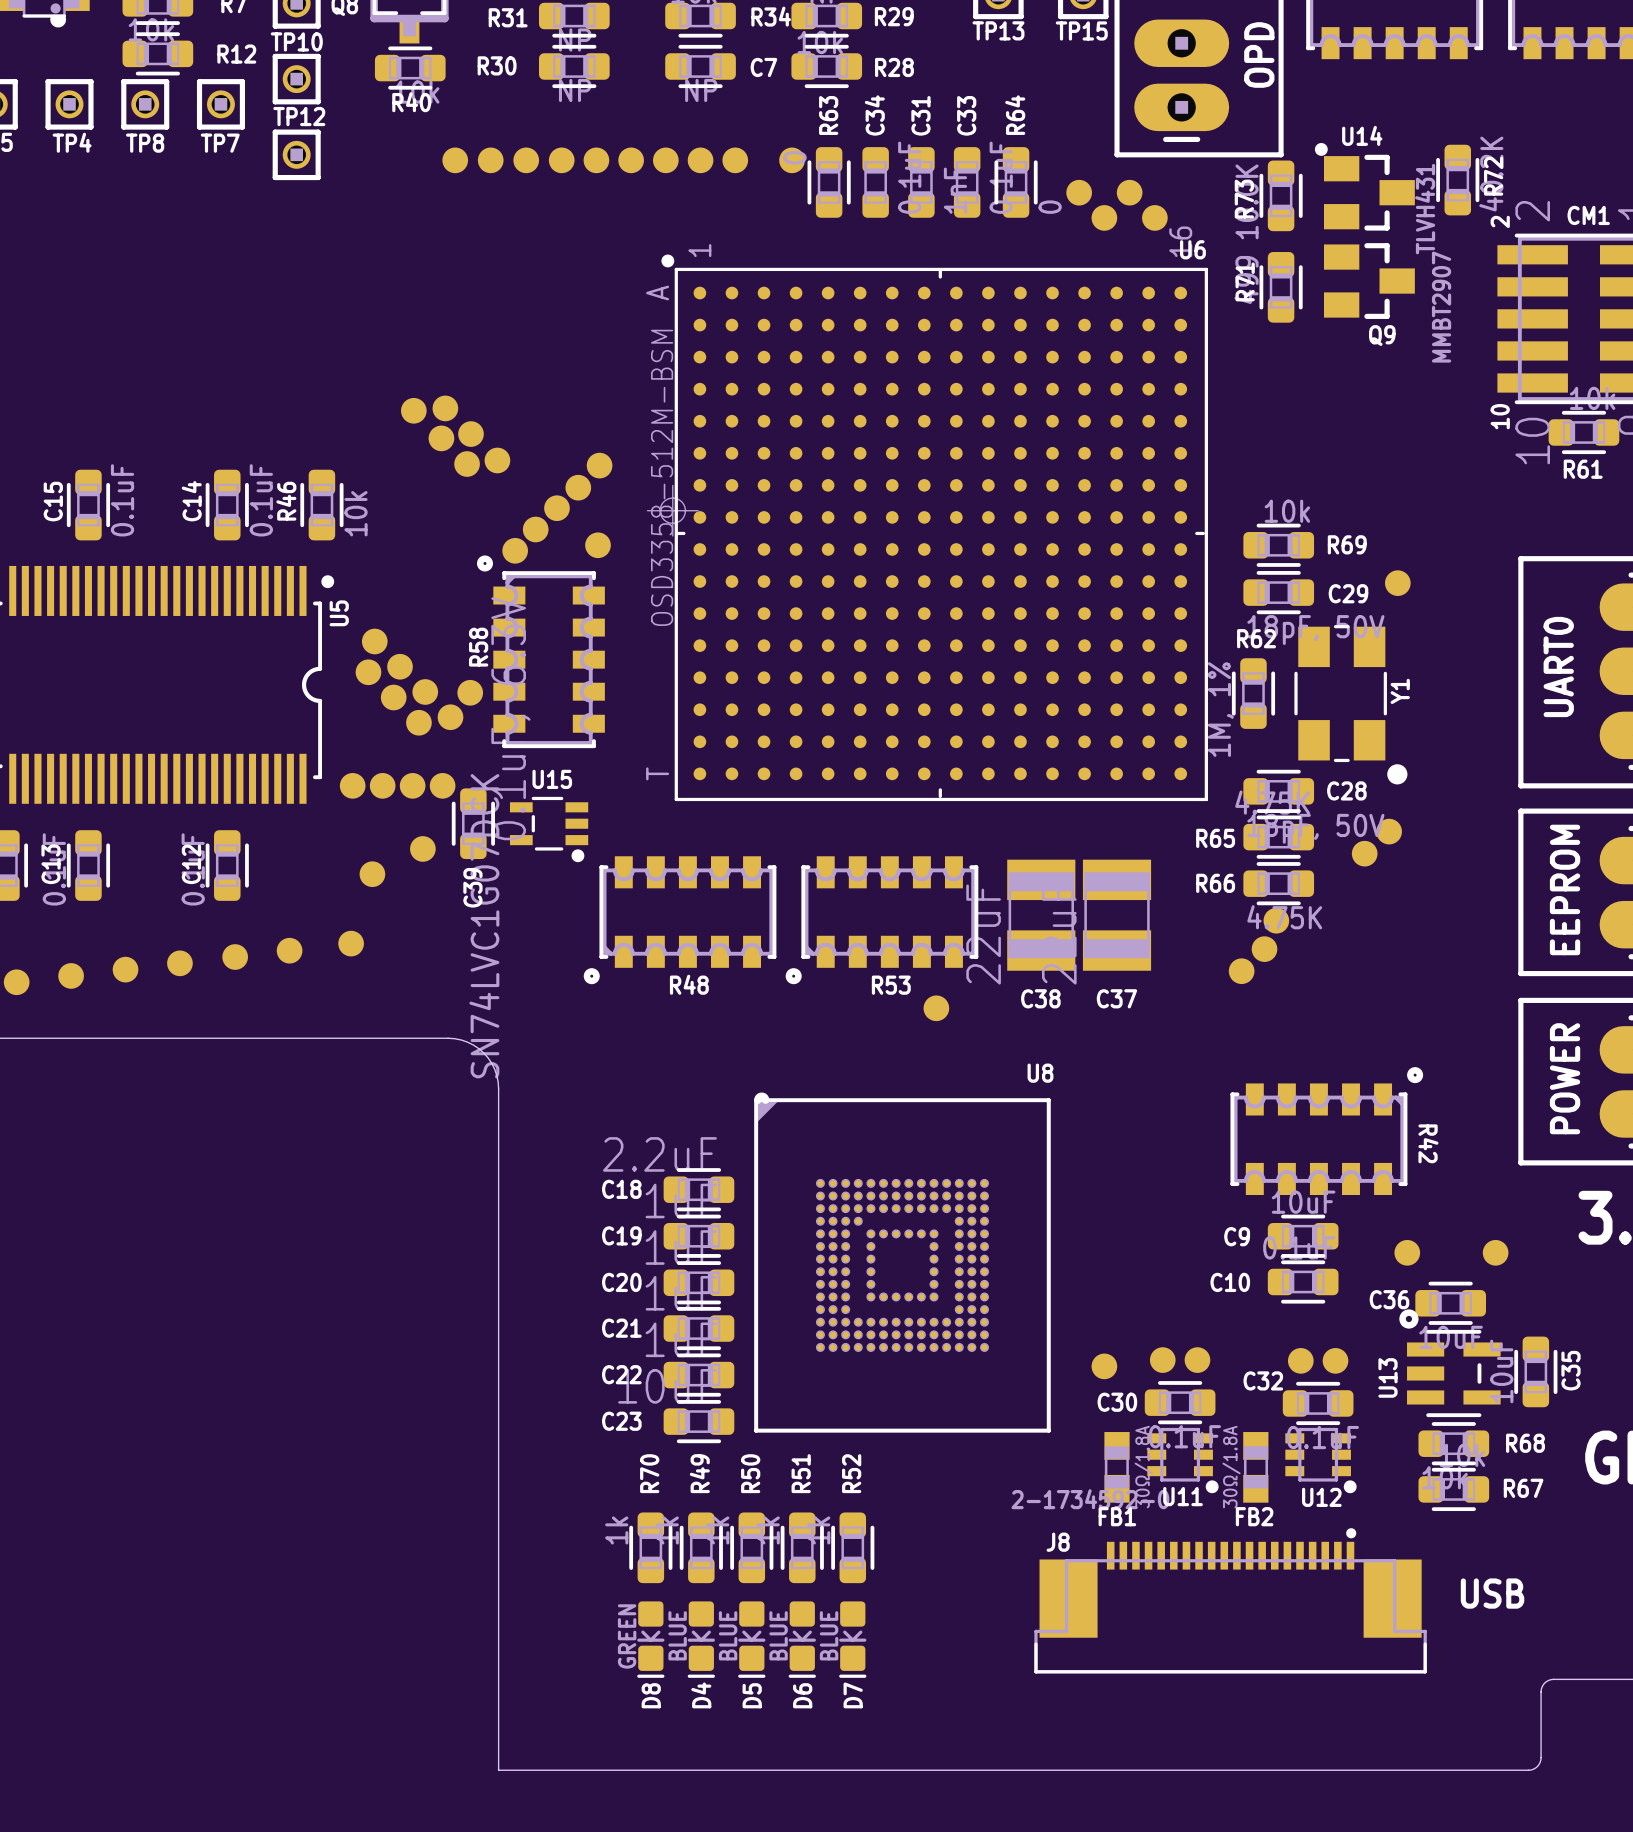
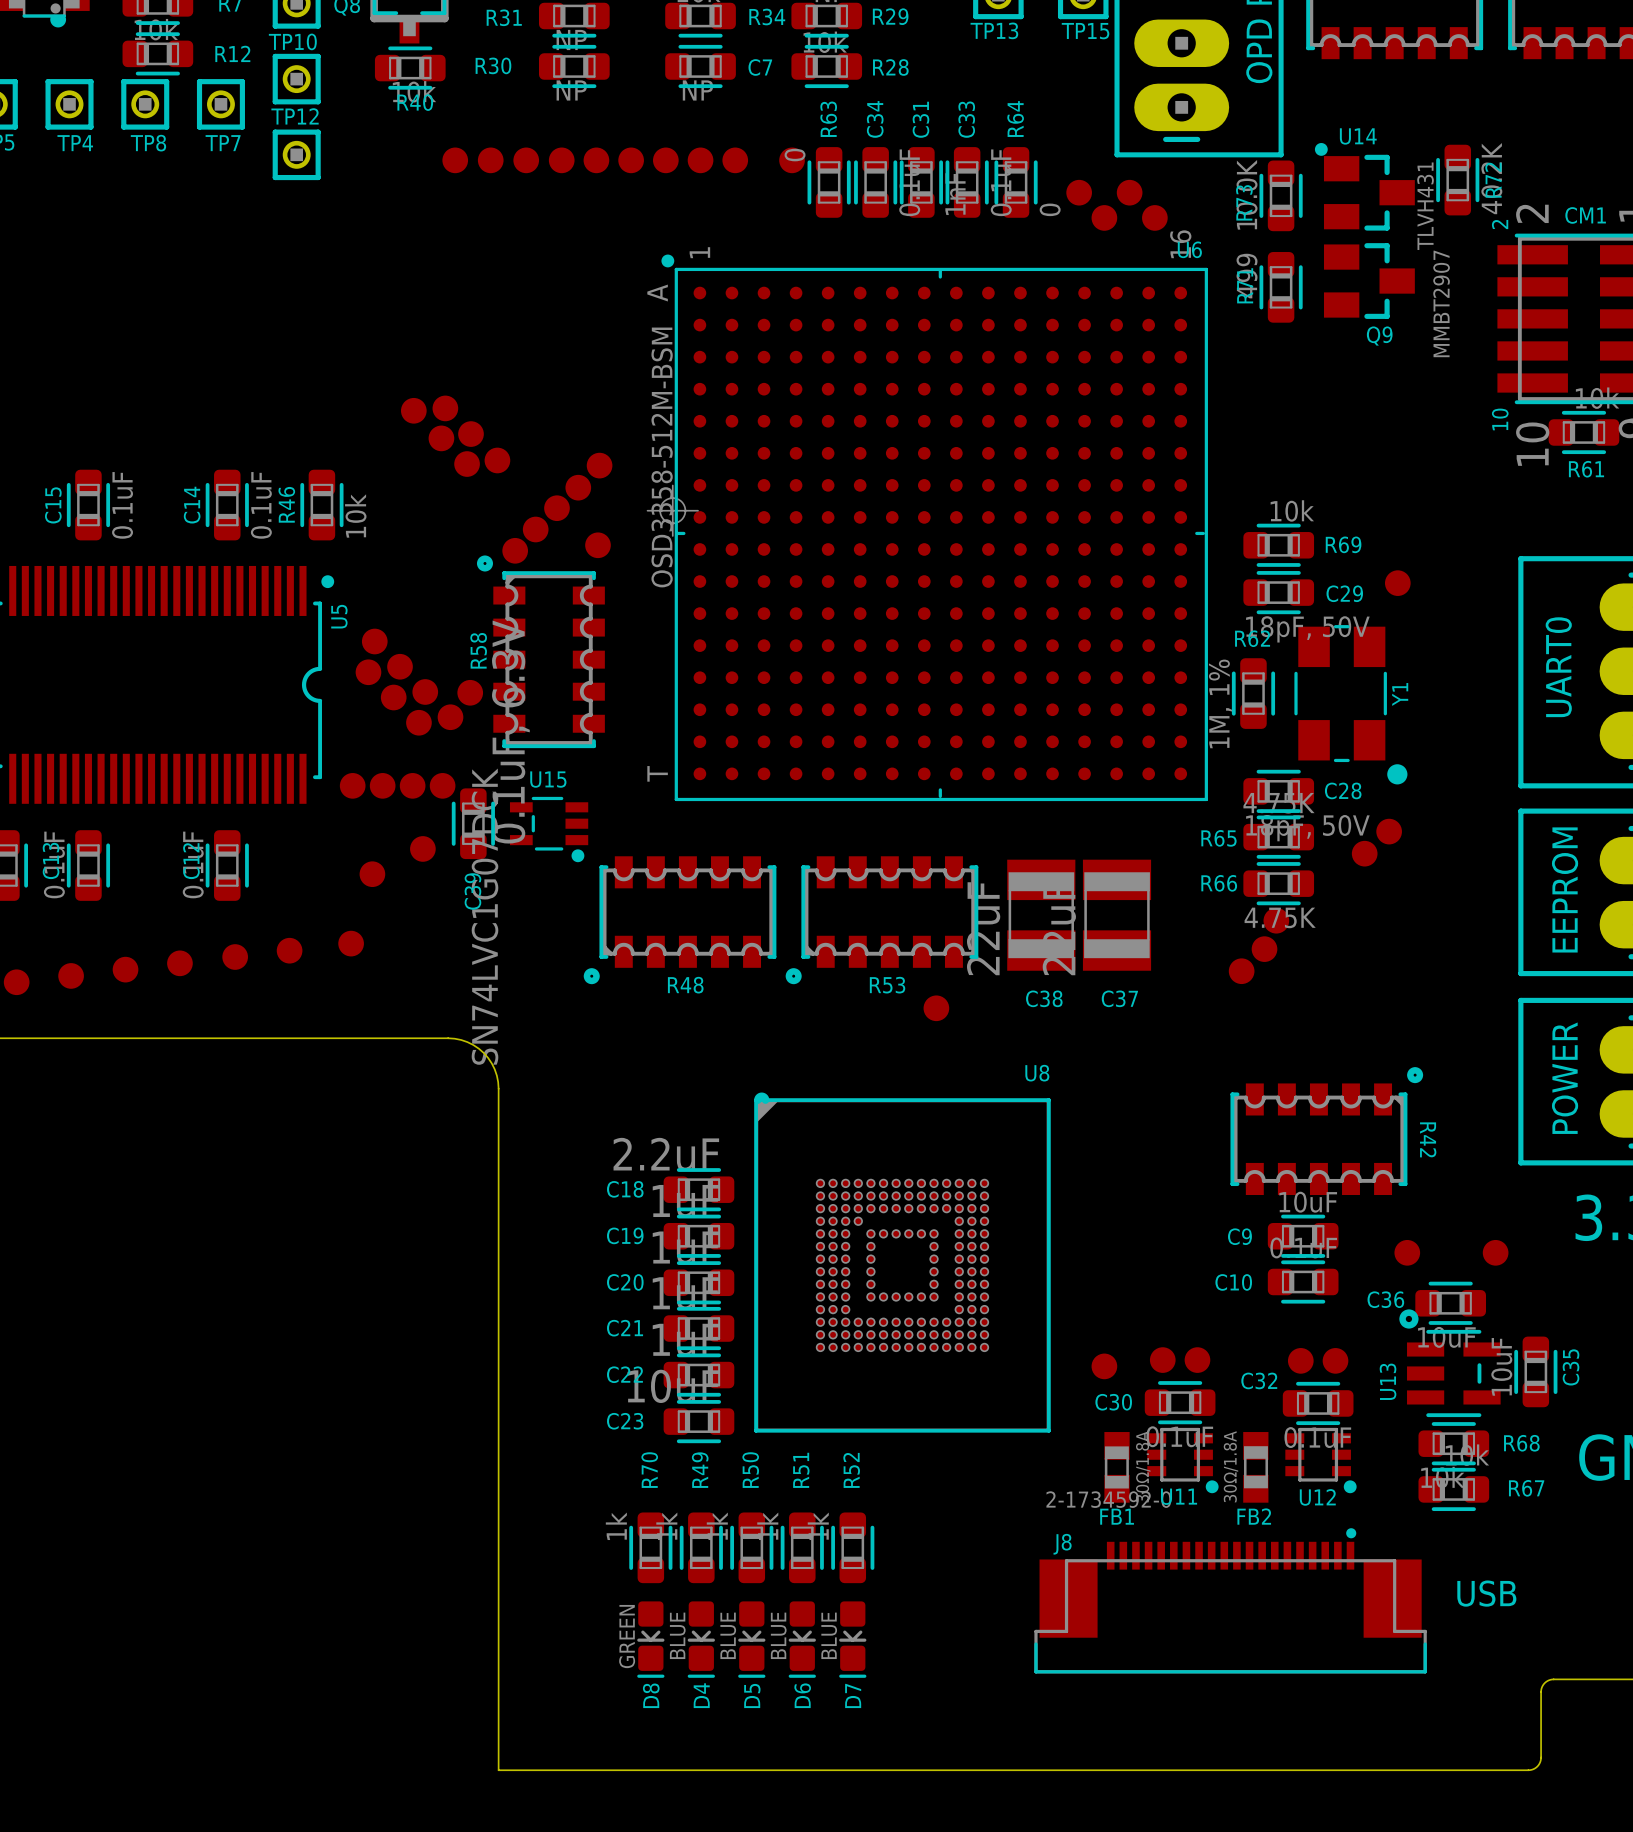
C34 footprint: [862, 147, 889, 218] -> [854, 147, 898, 218]
C31 footprint: [908, 147, 935, 218] -> [899, 147, 943, 218]
C33 footprint: [953, 147, 981, 218] -> [945, 147, 989, 218]

